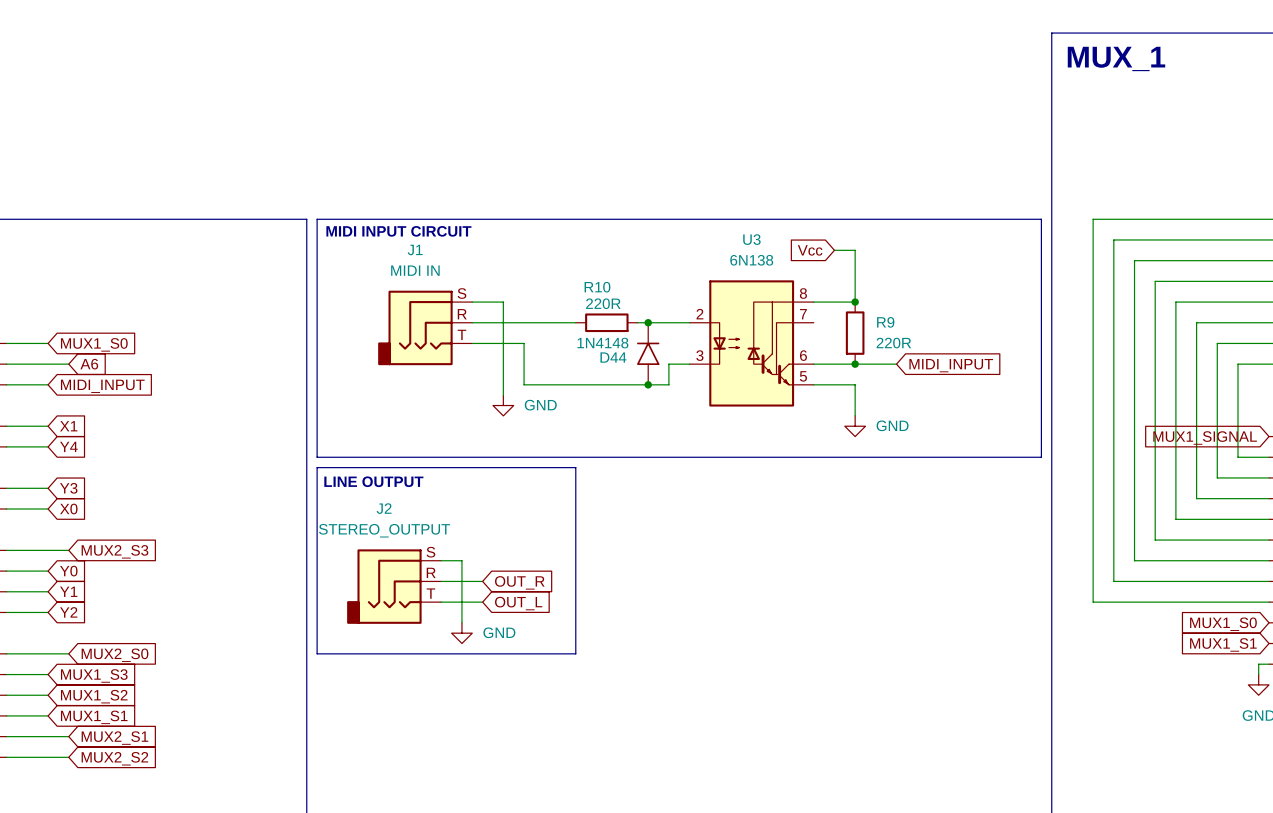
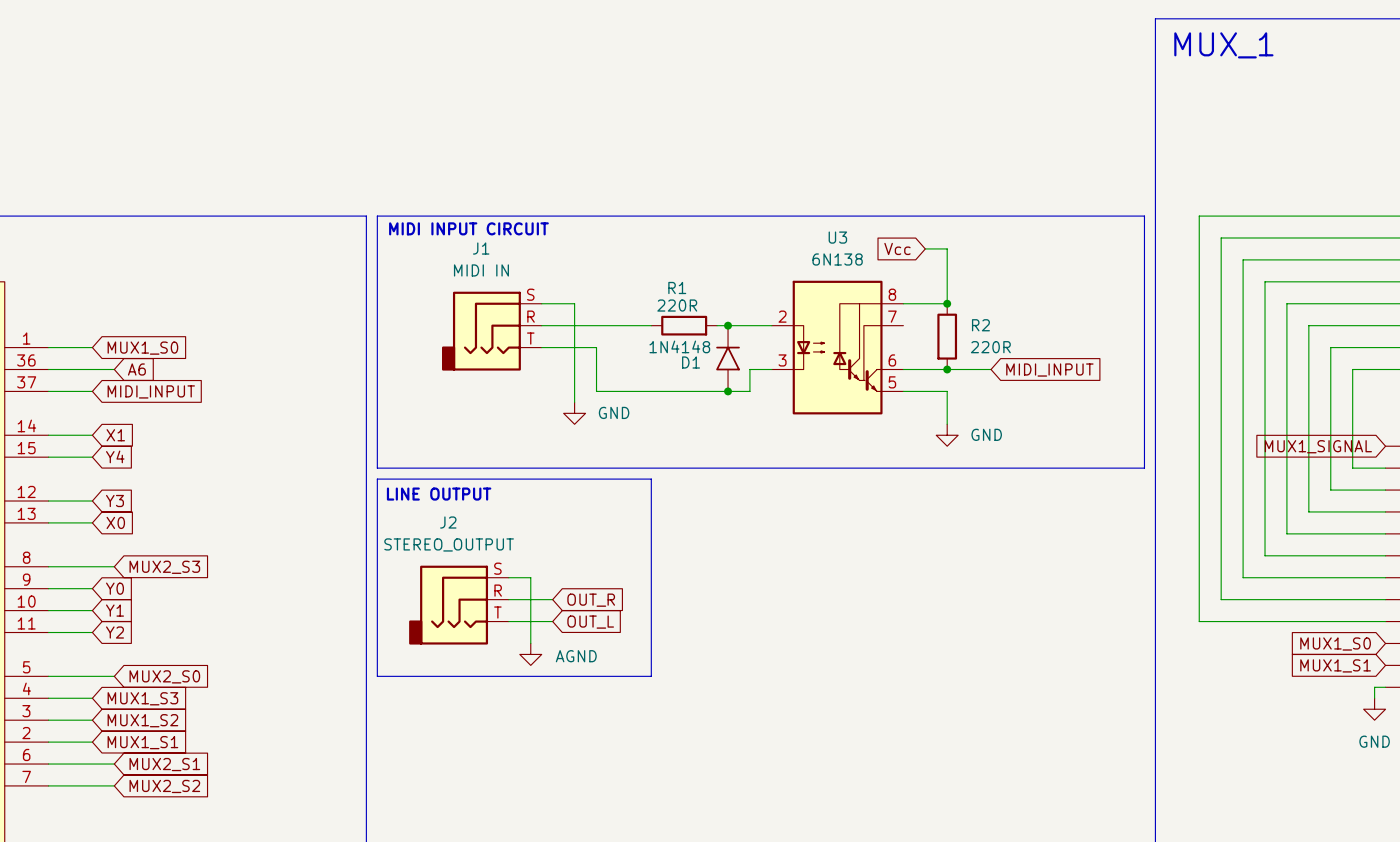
R10 name: R10 (597, 287) -> R1 (677, 287)
R9 name: R9 (885, 322) -> R2 (980, 325)
D44 name: D44 (613, 357) -> D1 (691, 362)
power symbol: GND (461, 633) -> AGND (530, 654)

